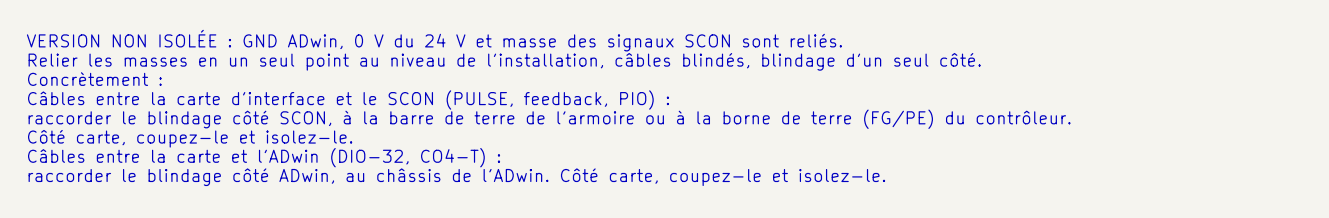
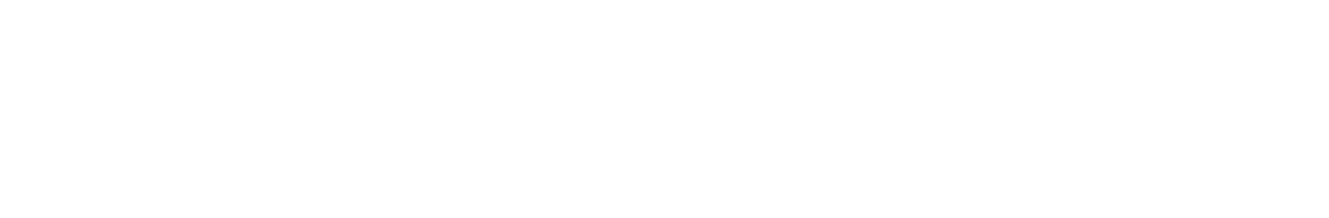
text: VERSION NON ISOLÉE : GND ADwin, 0 V du 24 V et masse des signaux SCON sont reliés. (434, 40) -> none
text: Relier les masses en un seul point au niveau de l'installation, câbles blindés, blindage d'un seul côté. (504, 61) -> none
text: Concrètement : (94, 79) -> none
text: Câbles entre la carte d'interface et le SCON (PULSE, feedback, PIO) : (348, 100) -> none
text: raccorder le blindage côté SCON, à la barre de terre de l'armoire ou à la borne de terre (FG/PE) du contrôleur. (549, 119) -> none
text: Côté carte, coupez-le et isolez-le. (190, 138) -> none
text: Câbles entre la carte et l'ADwin (DIO-32, CO4-T) : (264, 157) -> none
text: raccorder le blindage côté ADwin, au châssis de l'ADwin. Côté carte, coupez-le et isolez-le. (456, 177) -> none

